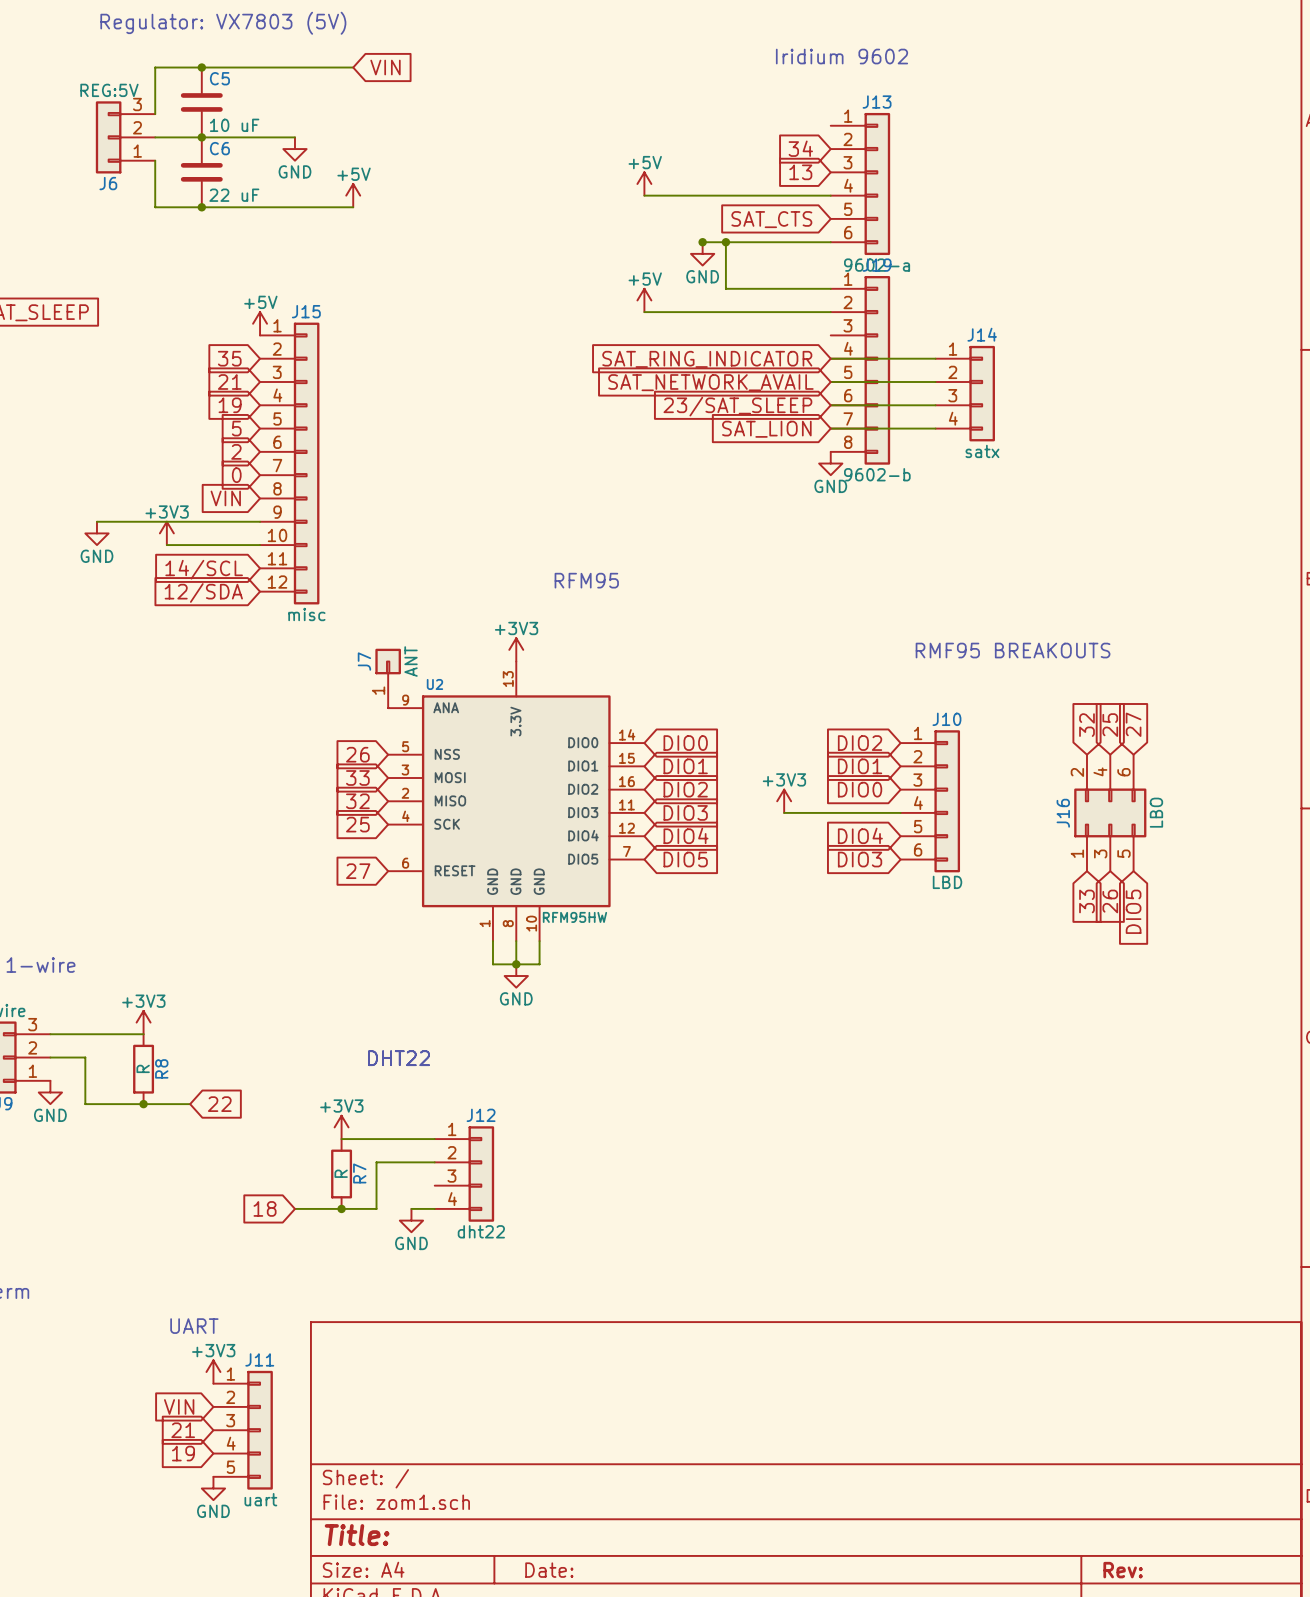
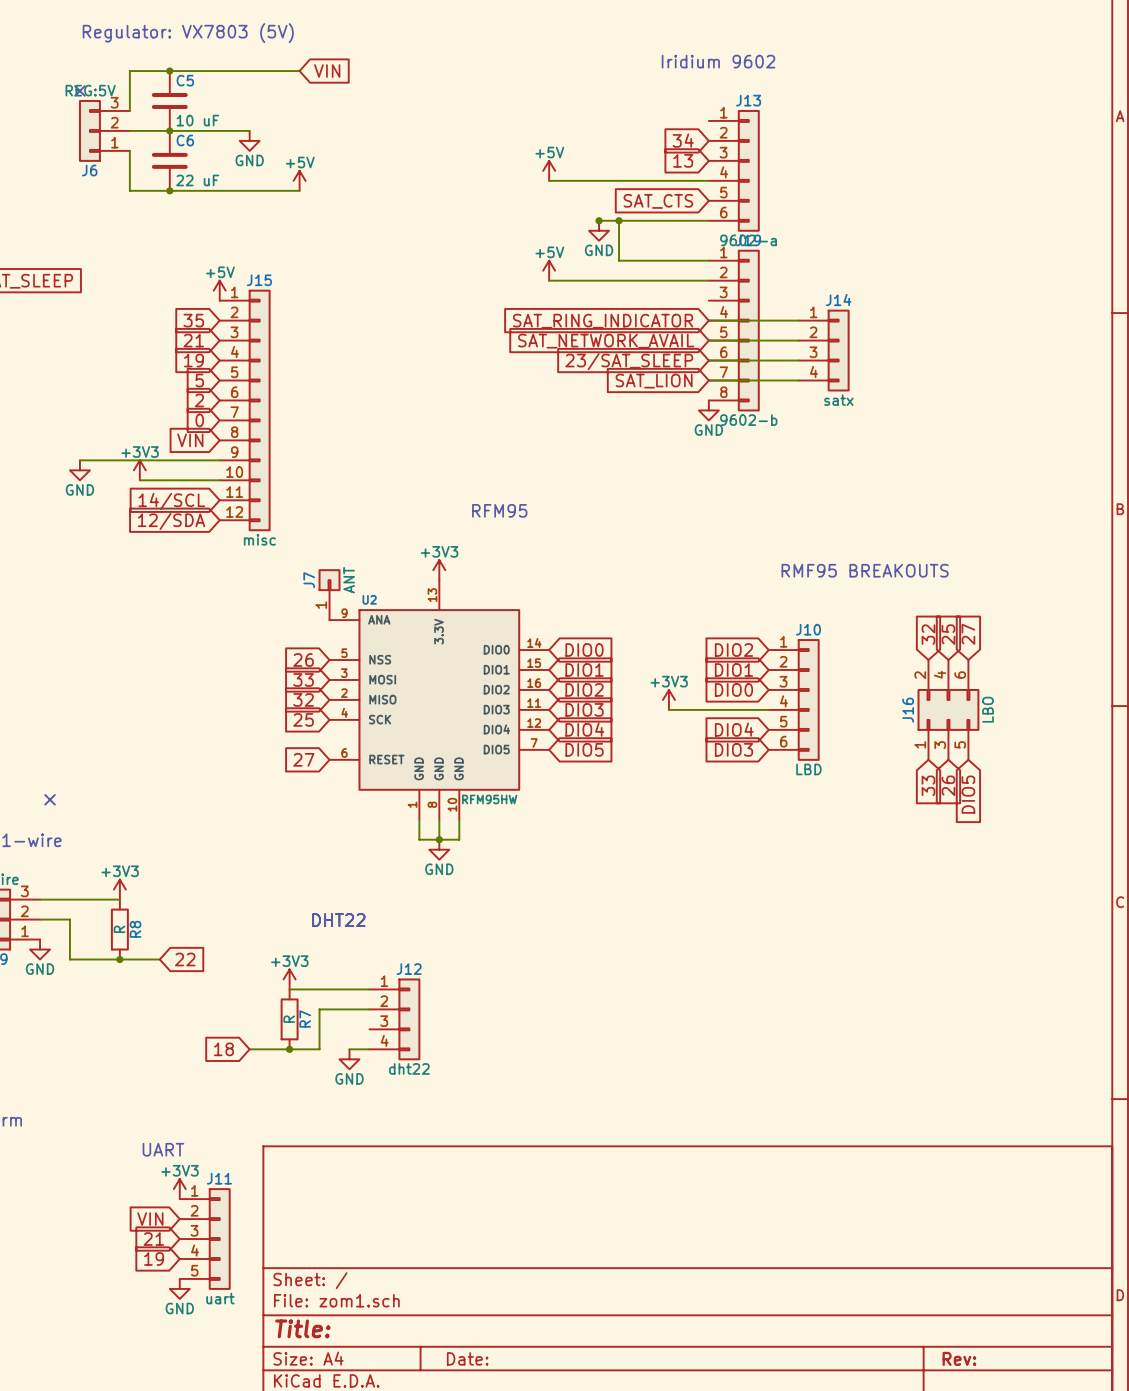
no-connect mark: none -> (79, 91)
no-connect mark: none -> (50, 799)

